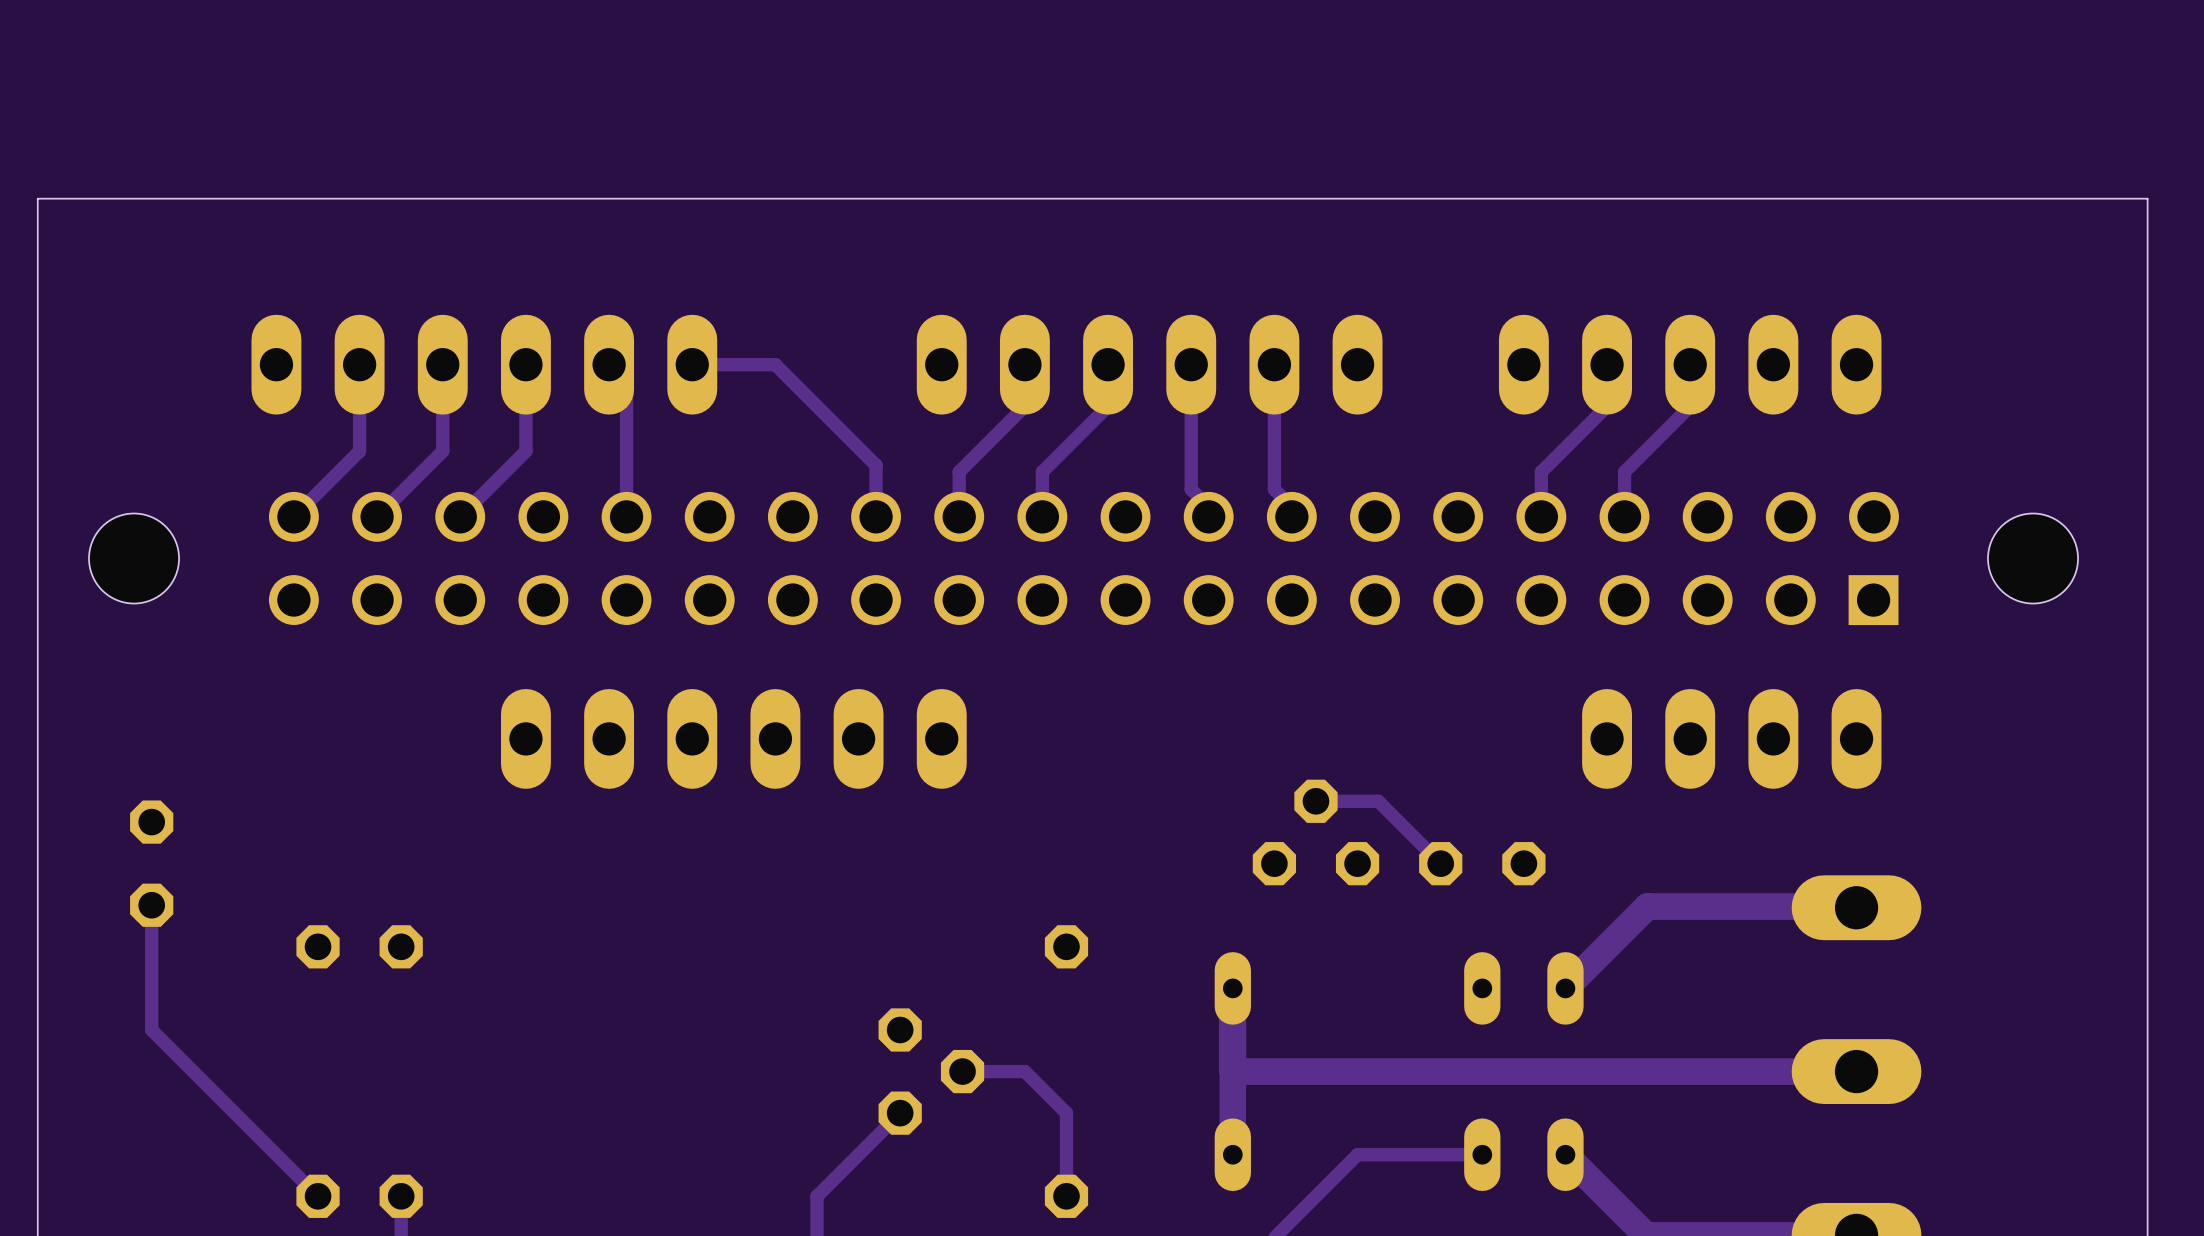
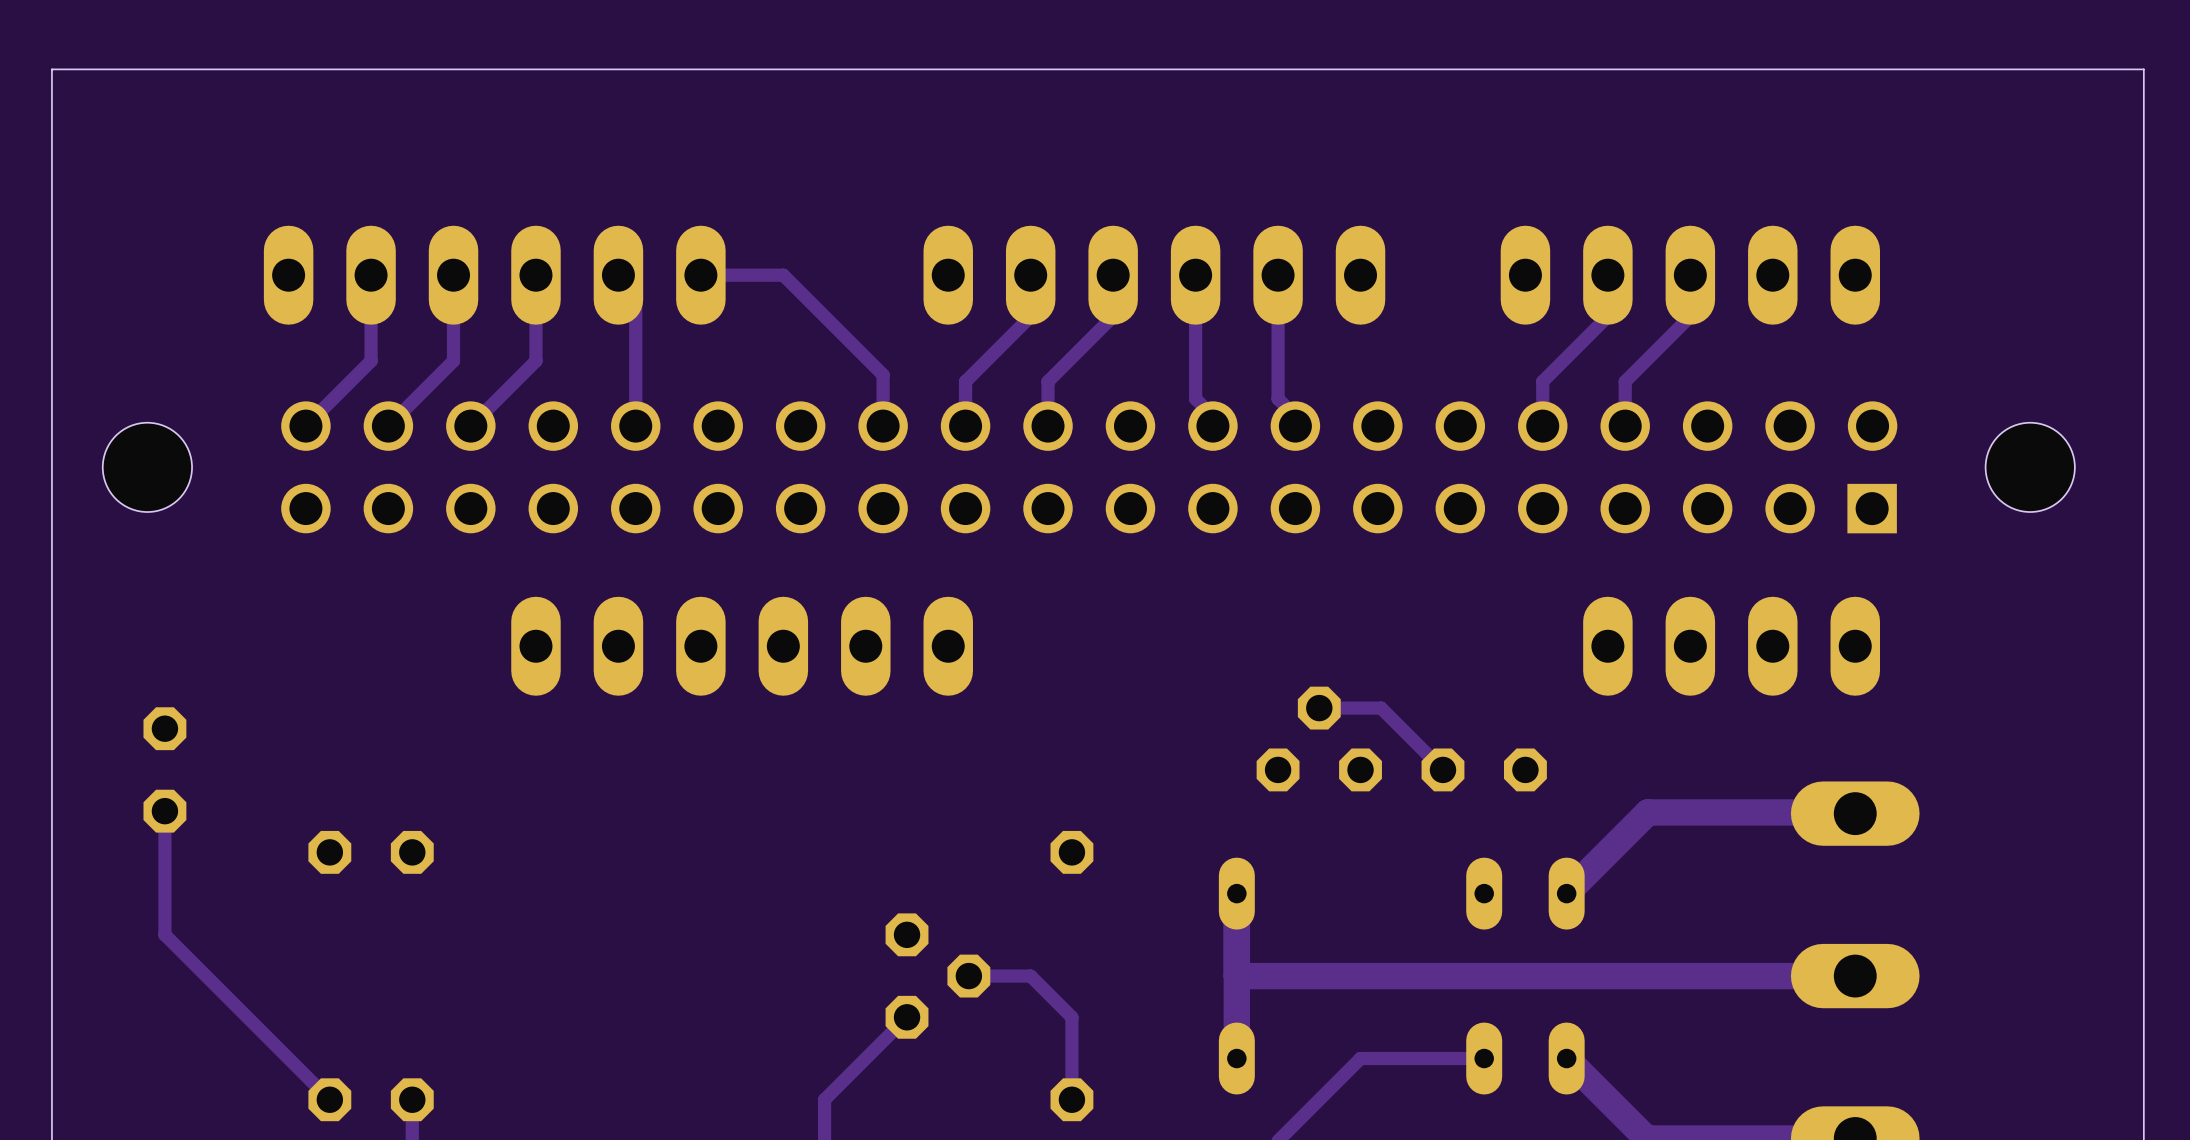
board edge: (2147, 198) (37, 198) -> (2143, 110) (2143, 69) (51, 69) (51, 110)

